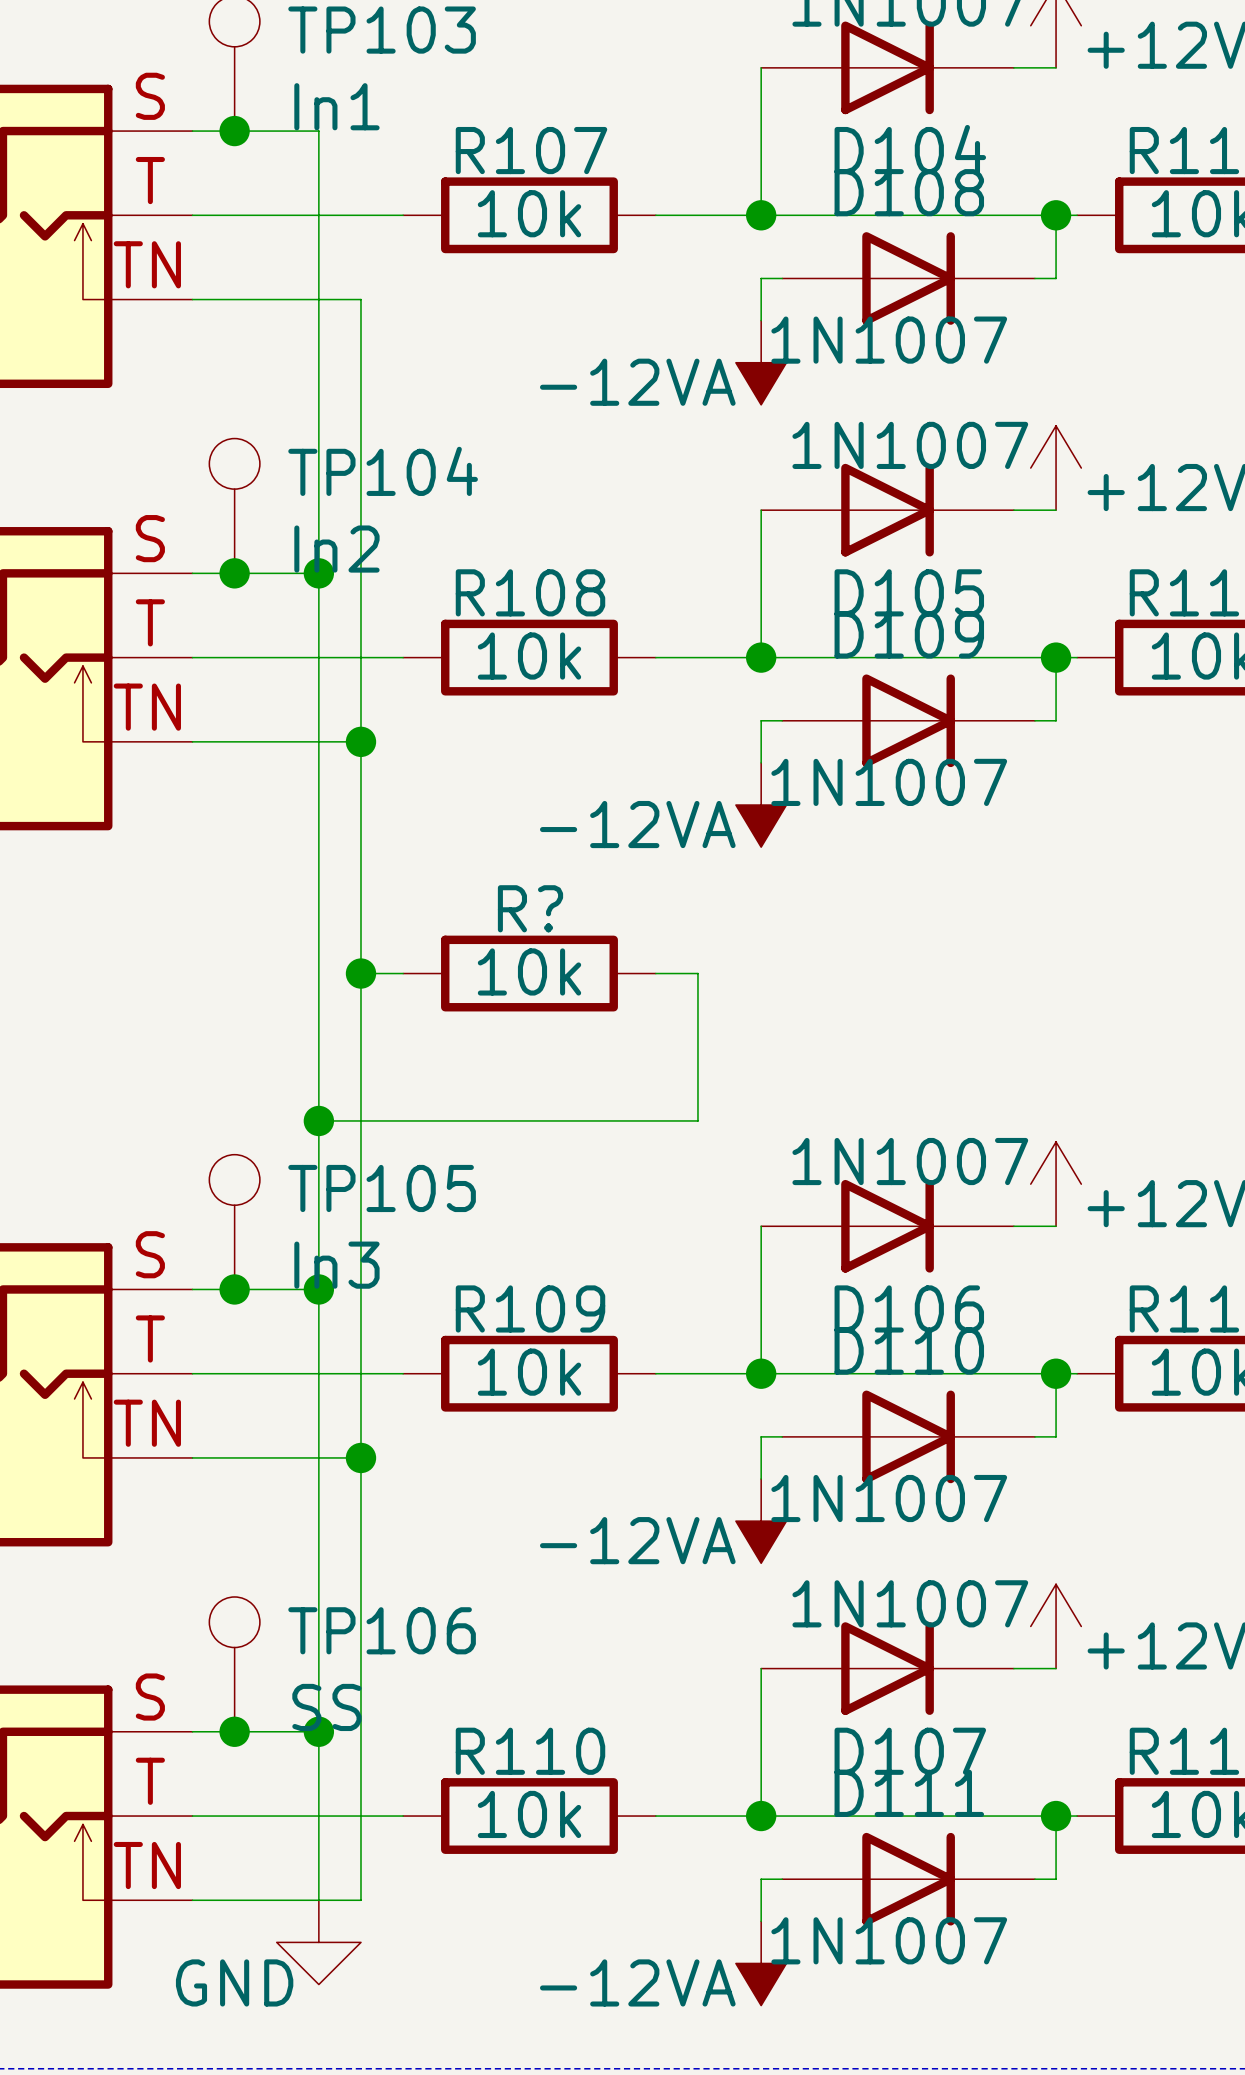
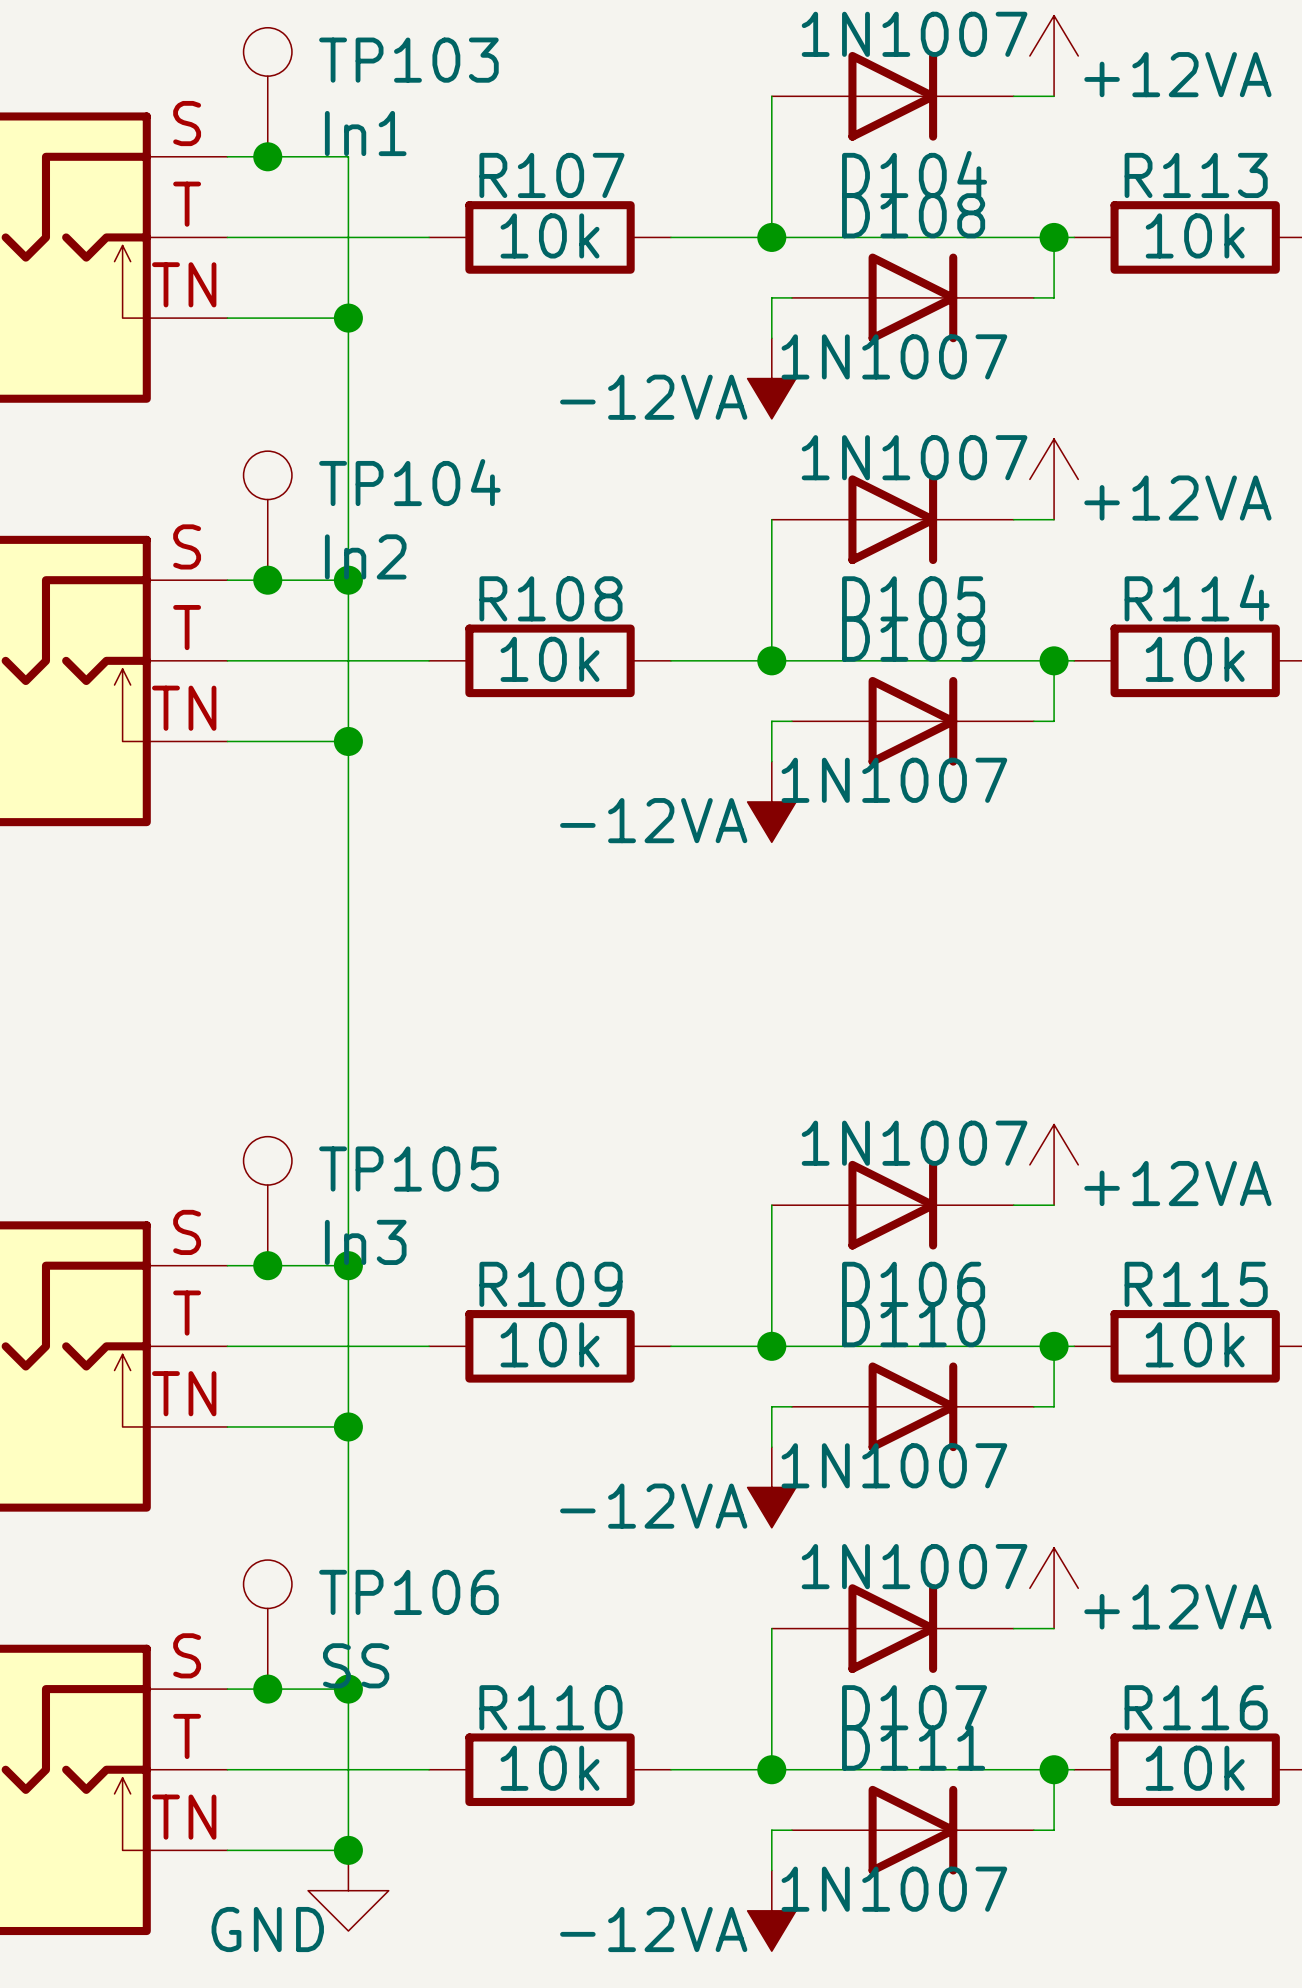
wire: (318, 299) (360, 299) (360, 1900) (318, 1900) -> none
junction: none -> (348, 318)
wire: (318, 741) (360, 741) -> none
junction position: (360, 741) -> (348, 741)
wire: (360, 973) (403, 973) -> none
junction: (360, 973) -> none
R?: 10k (529, 973) -> none
wire: (655, 973) (697, 973) (697, 1120) (318, 1120) -> none
junction: (318, 1120) -> none
wire: (318, 1457) (360, 1457) -> none
junction position: (360, 1457) -> (348, 1426)
junction: none -> (348, 1850)

